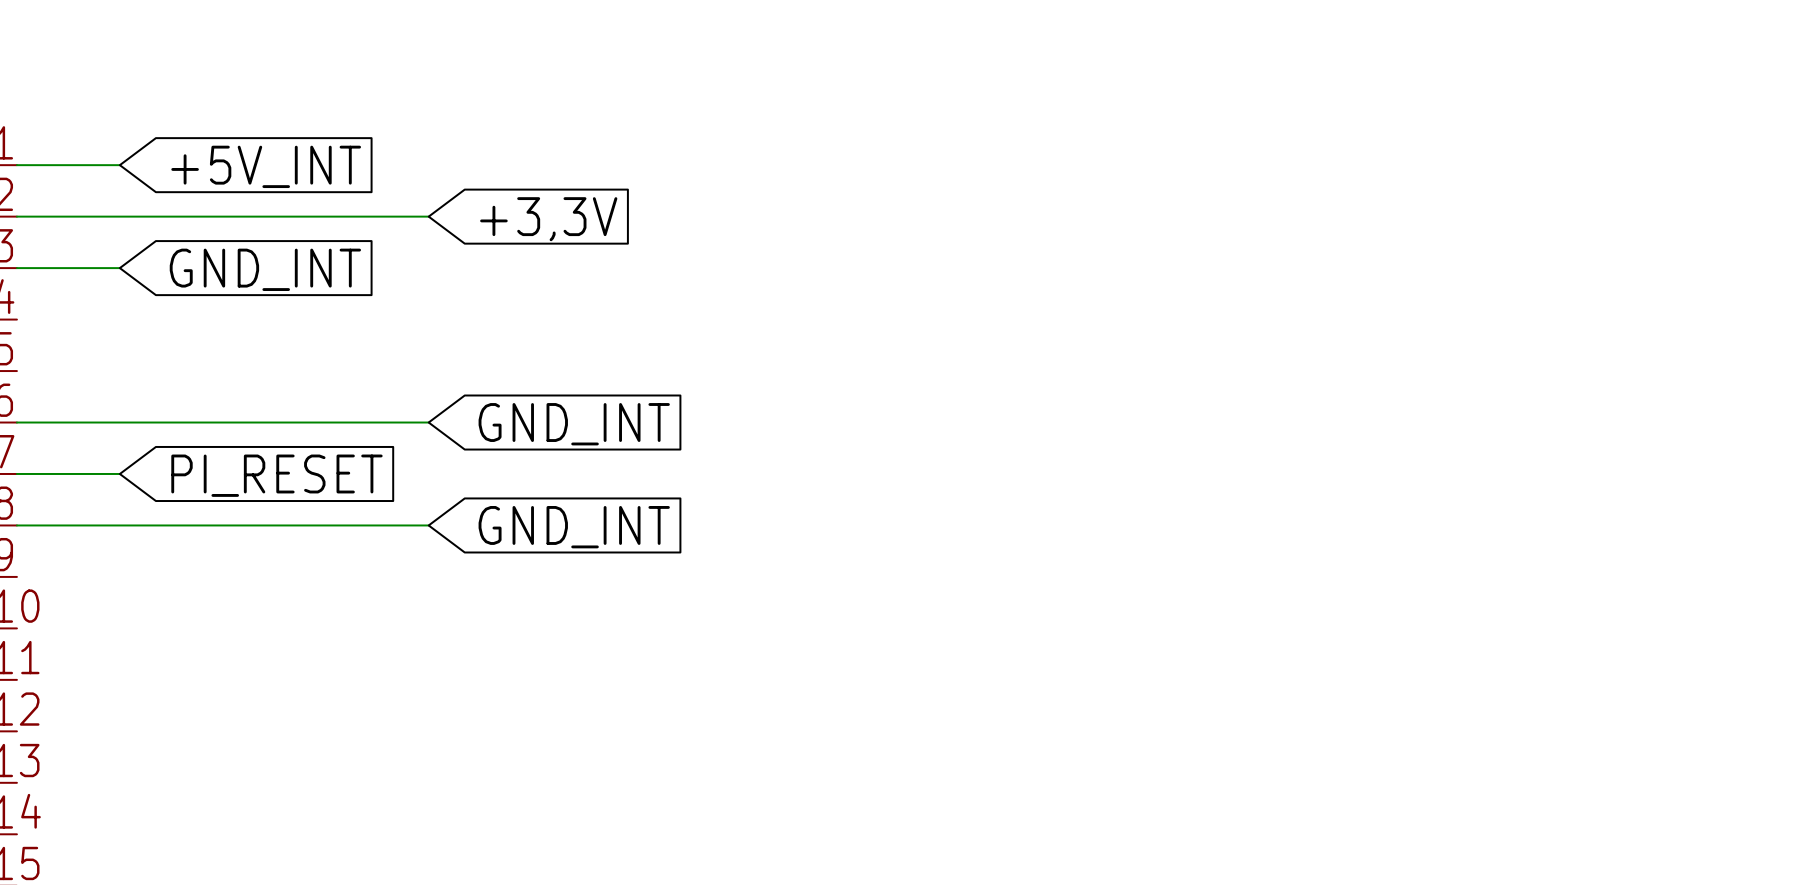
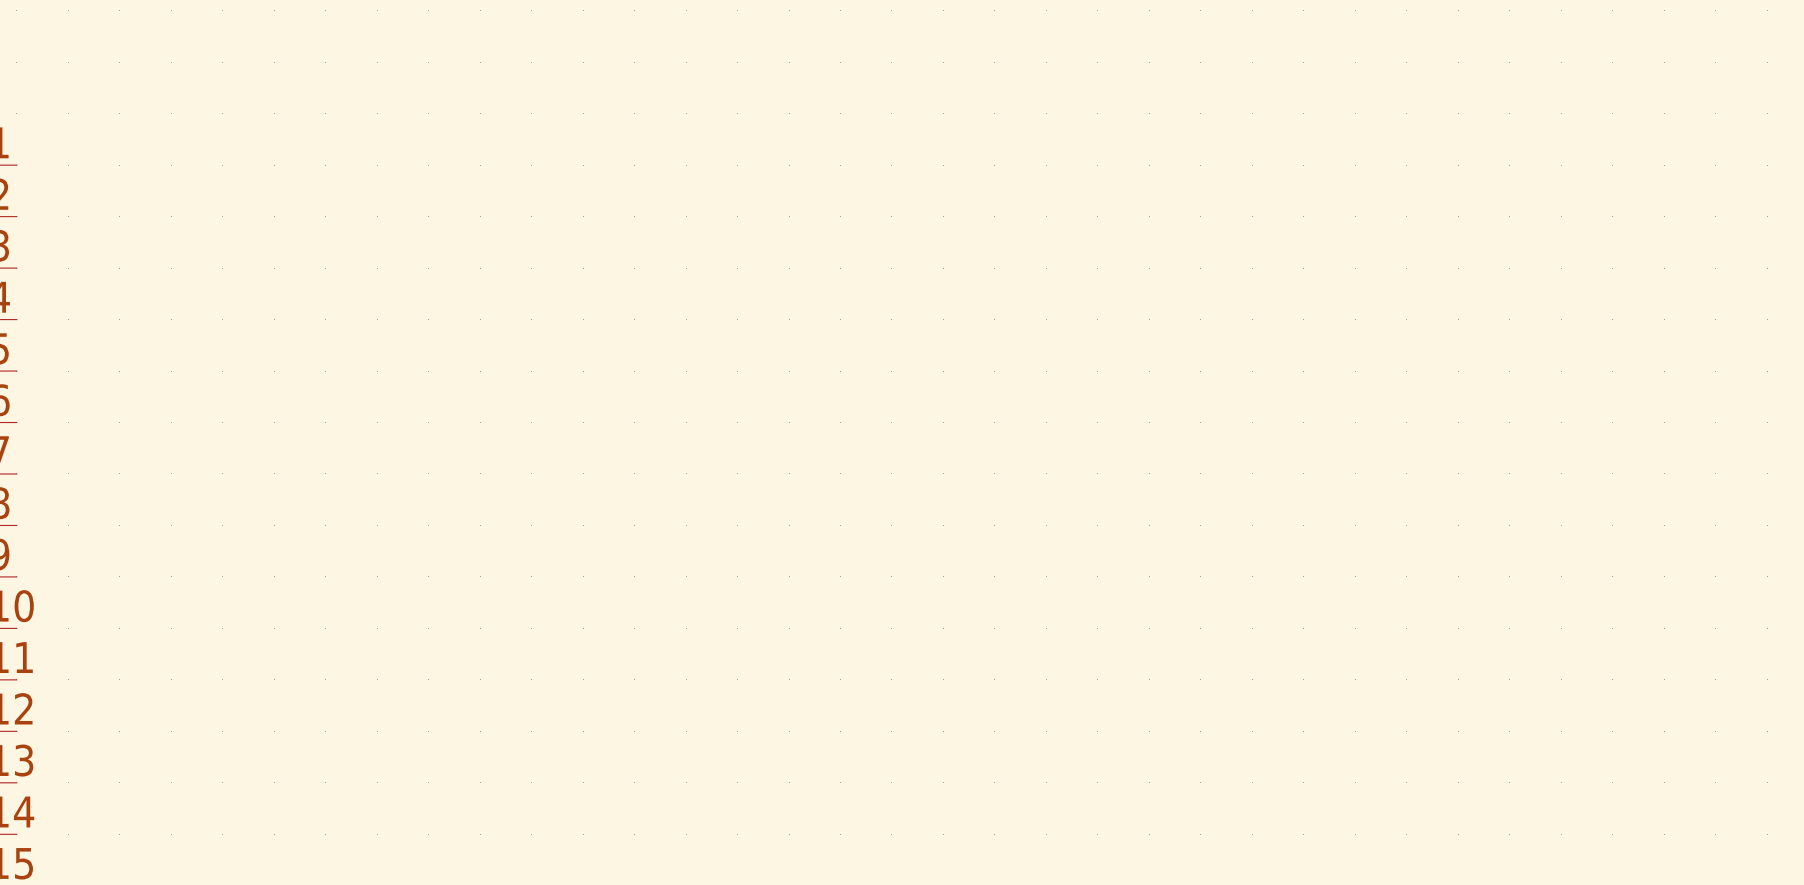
wire: (16, 165) (119, 165) -> none
global label: +5V_INT (266, 166) -> none
wire: (16, 216) (428, 216) -> none
global label: +3,3V (548, 219) -> none
wire: (16, 268) (119, 268) -> none
global label: GND_INT (265, 269) -> none
wire: (16, 422) (428, 422) -> none
global label: GND_INT (574, 424) -> none
wire: (16, 473) (119, 473) -> none
global label: PI_RESET (276, 475) -> none
wire: (16, 525) (428, 525) -> none
global label: GND_INT (574, 527) -> none

